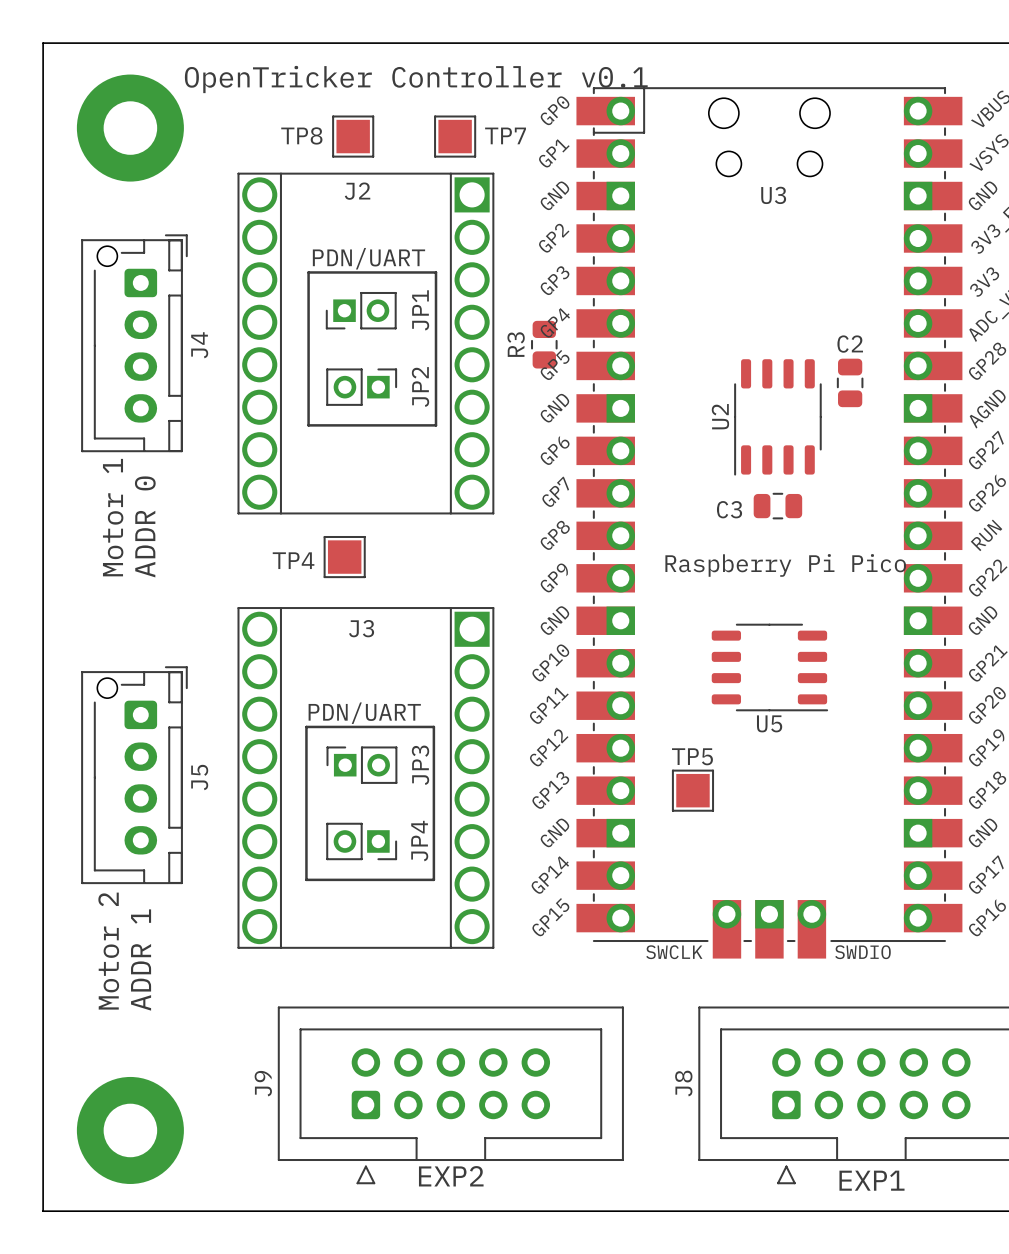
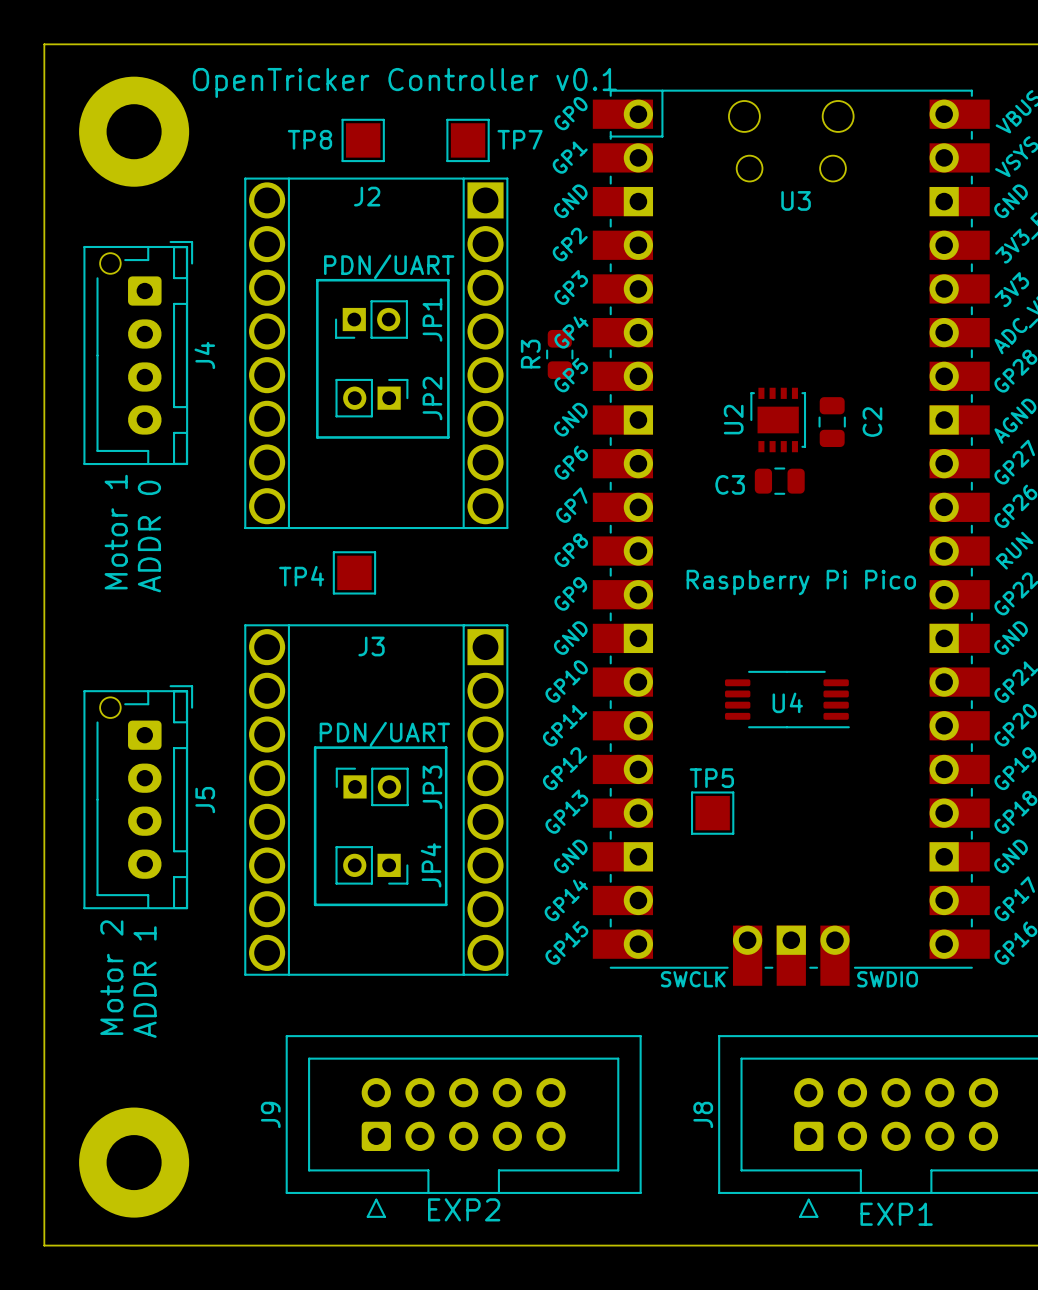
C2 name rotation: 0° (850, 344) -> 90° counterclockwise (872, 422)
C2 name position: C2 (850, 344) -> C2 (872, 422)
U2 footprint: [734, 359, 822, 476] -> [750, 387, 807, 453]
C2 position: (850, 382) -> (832, 422)
C3 position: (777, 506) -> (779, 481)
U5: (769, 667) -> none
U4: none -> (787, 699)

